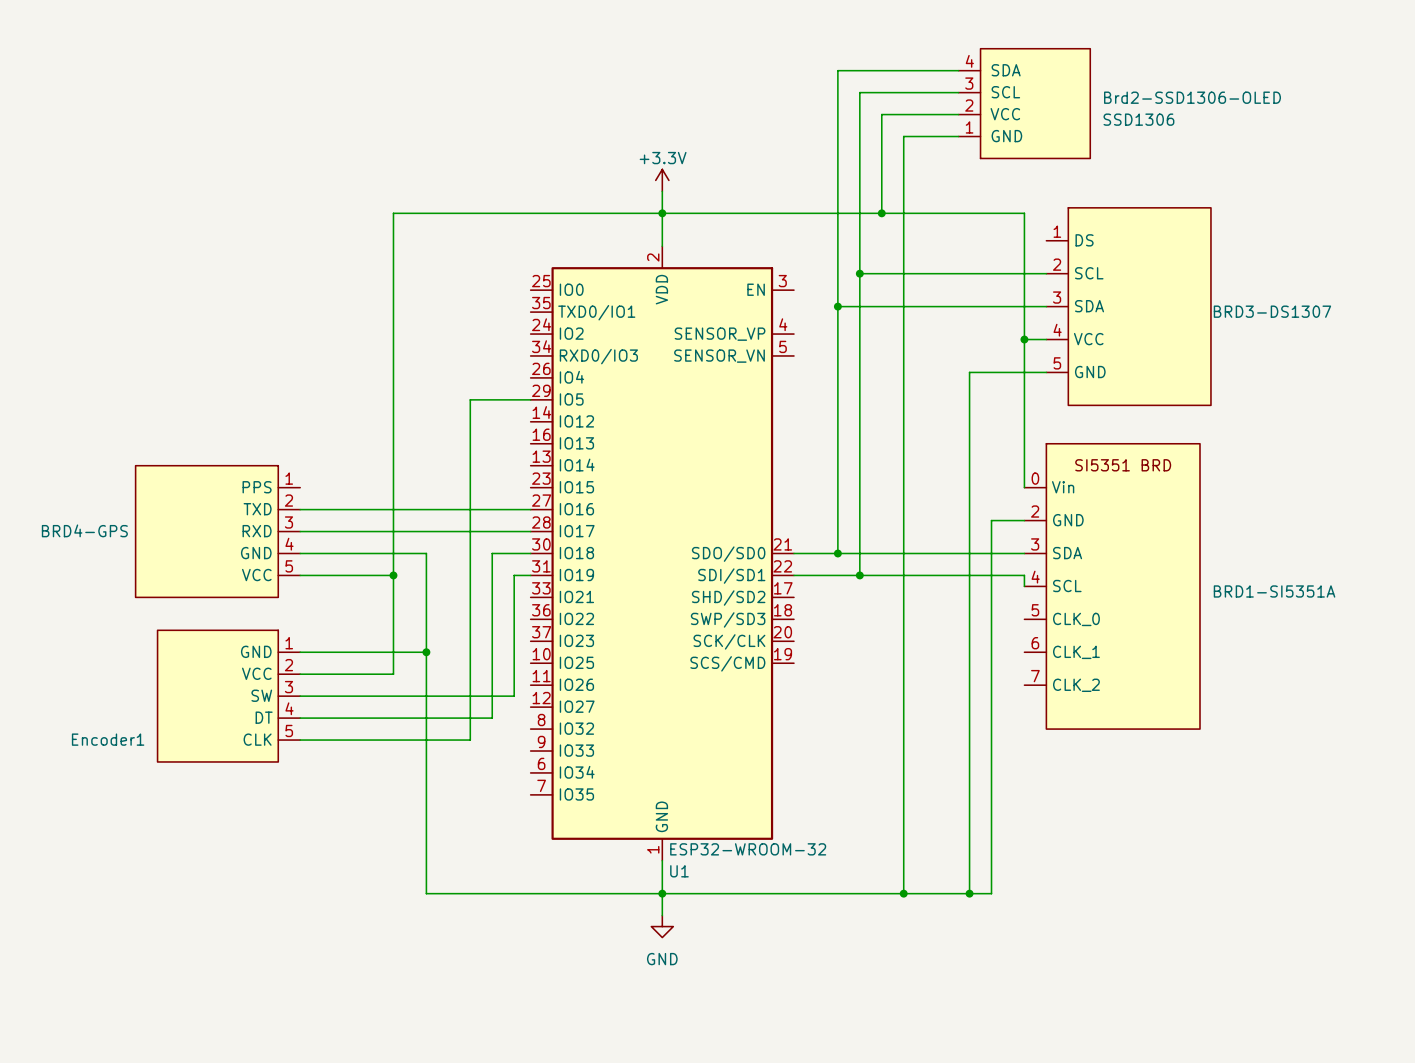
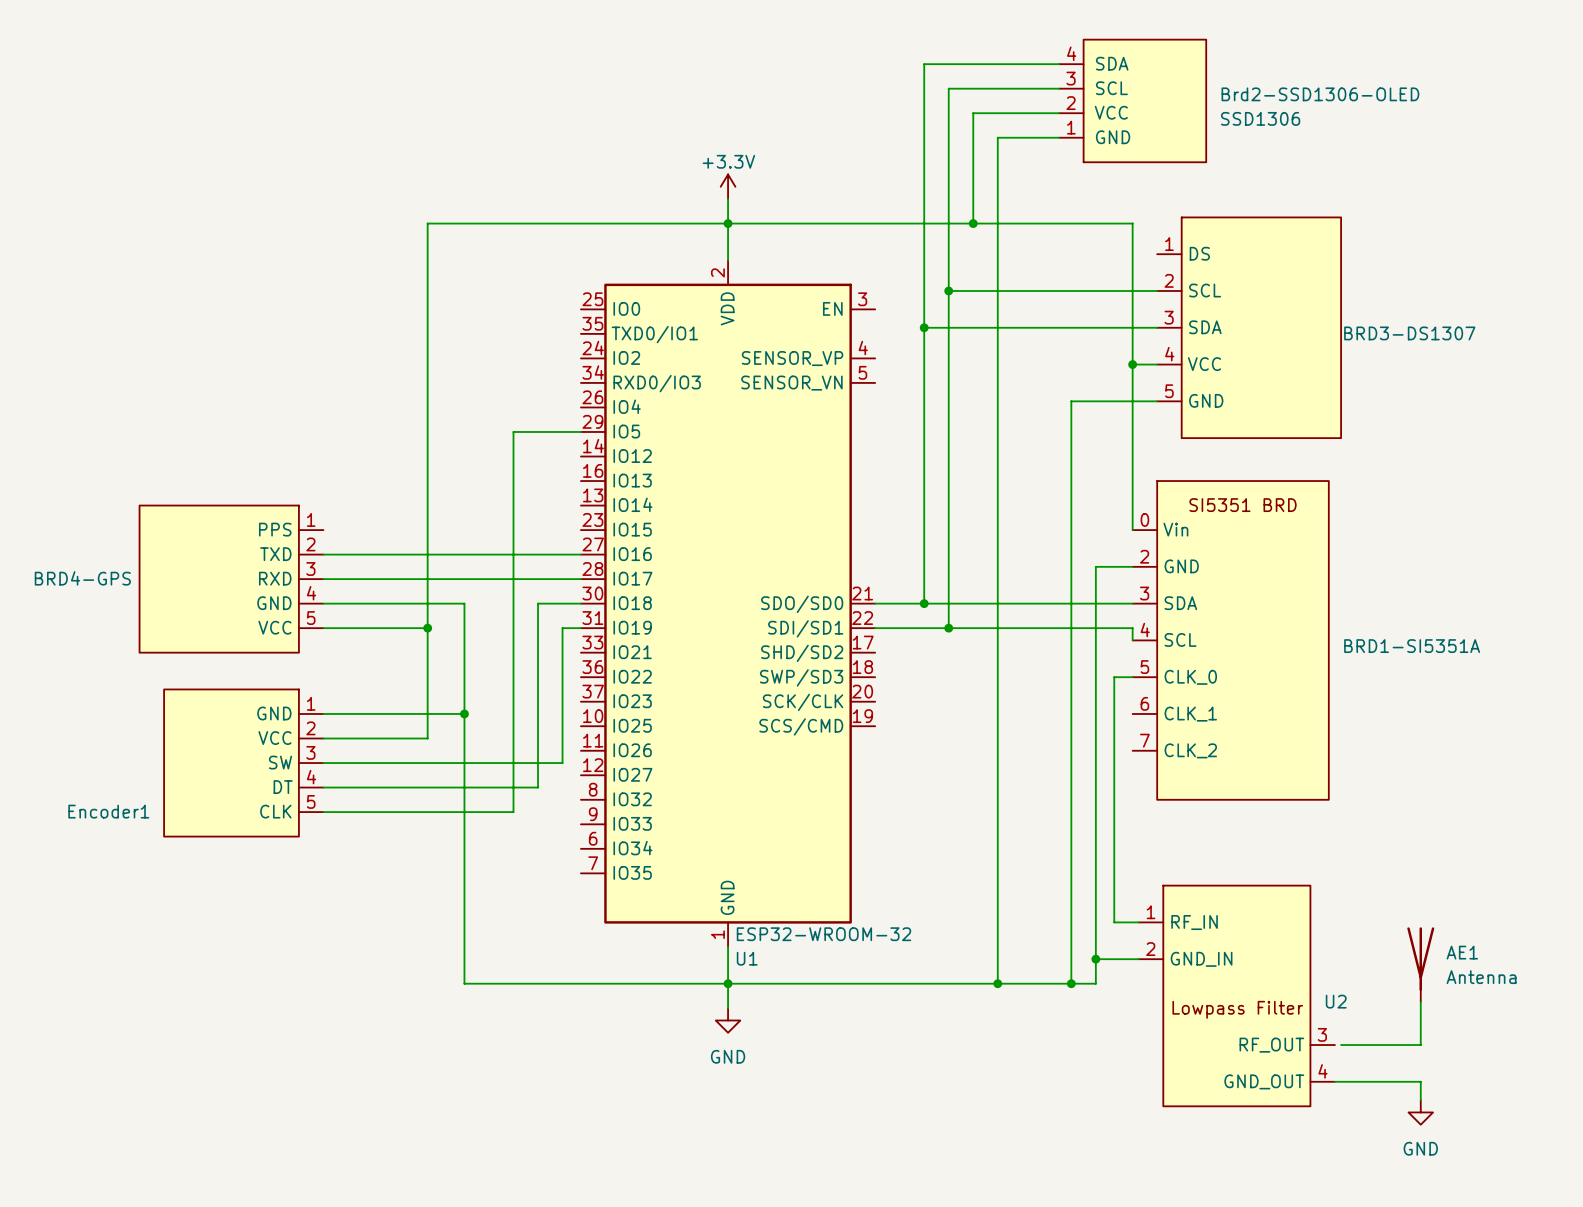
wire: none -> (1132, 677) (1114, 677) (1114, 922) (1138, 922)
wire: none -> (1095, 959) (1138, 959)
junction: none -> (1095, 959)
AE1: none -> Antenna (1420, 964)
U2: none -> (1236, 995)
wire: none -> (1420, 1002) (1420, 1045) (1341, 1045)
wire: none -> (1334, 1081) (1420, 1081) (1420, 1100)
power symbol: none -> GND (1420, 1112)

